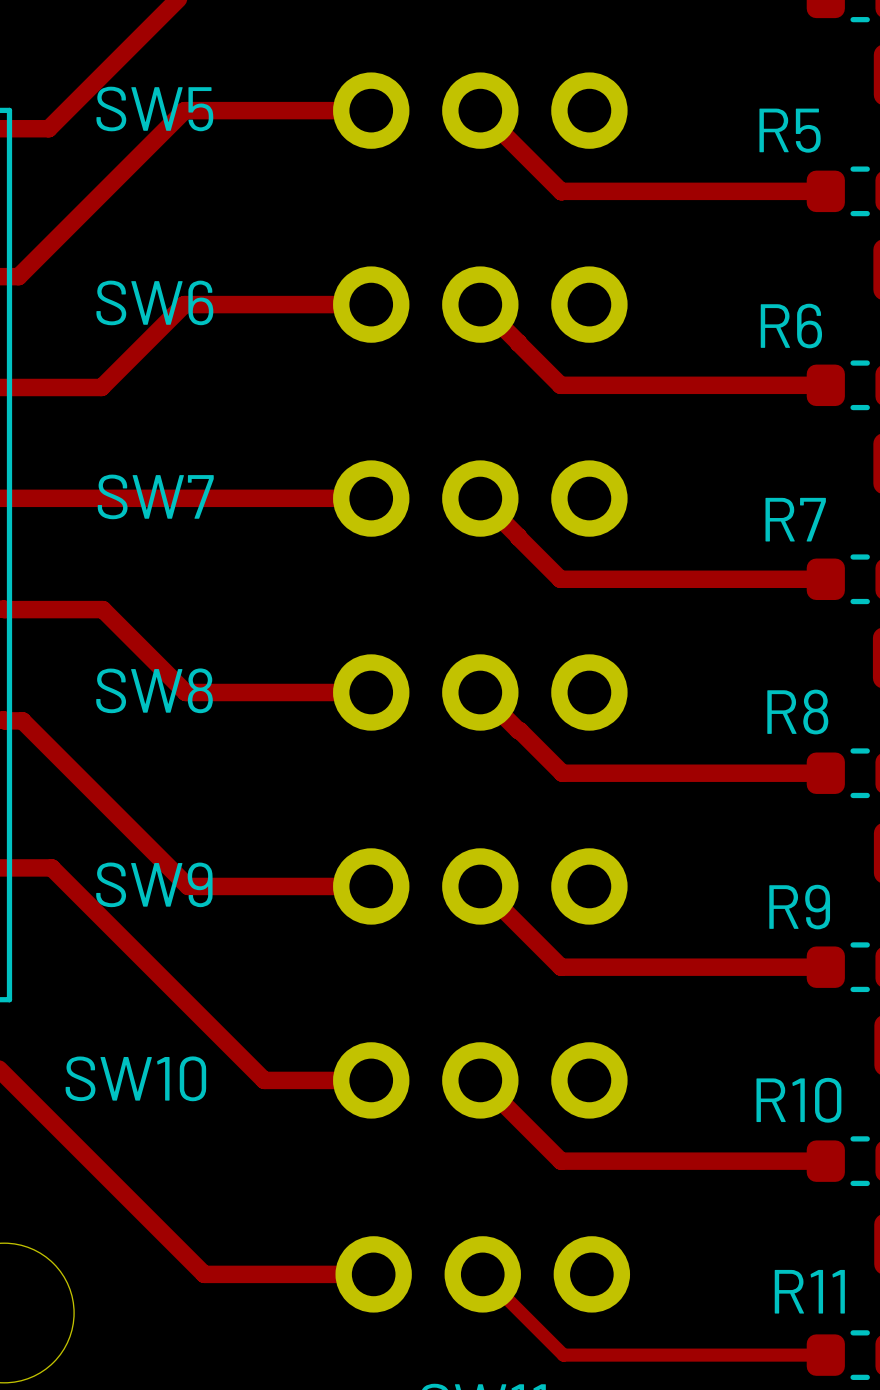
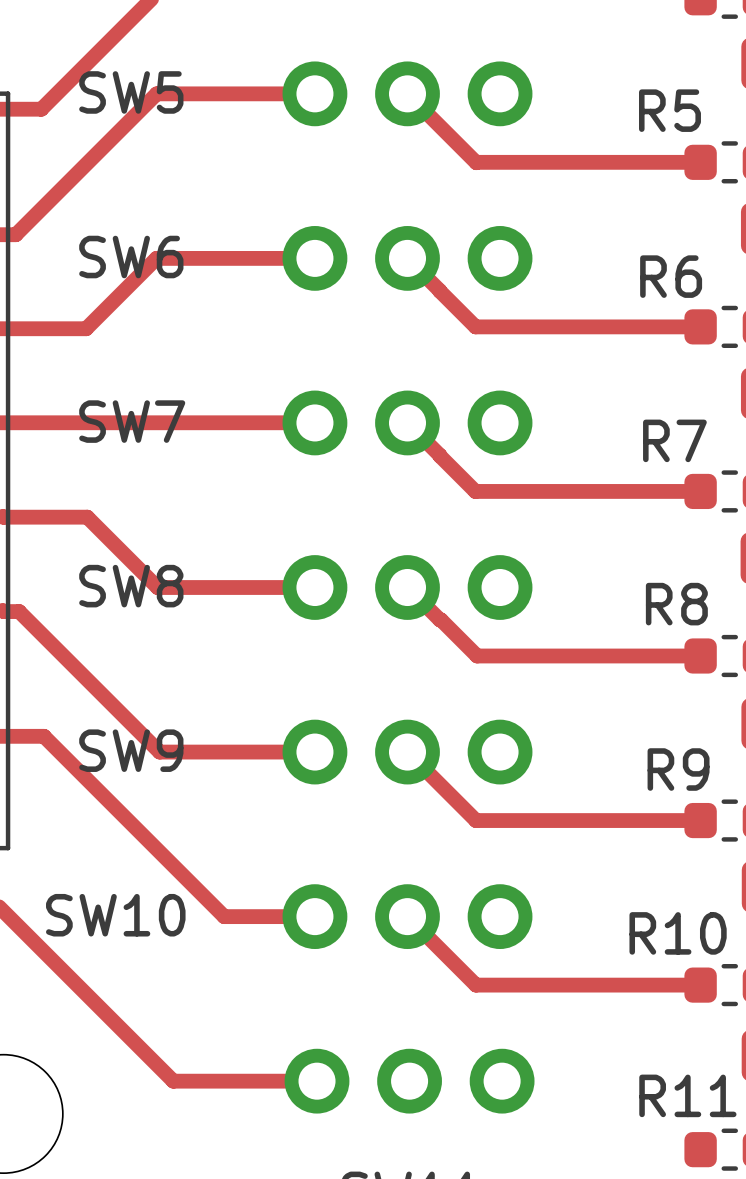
top track: (482, 1274) (563, 1355) (825, 1355) -> none

